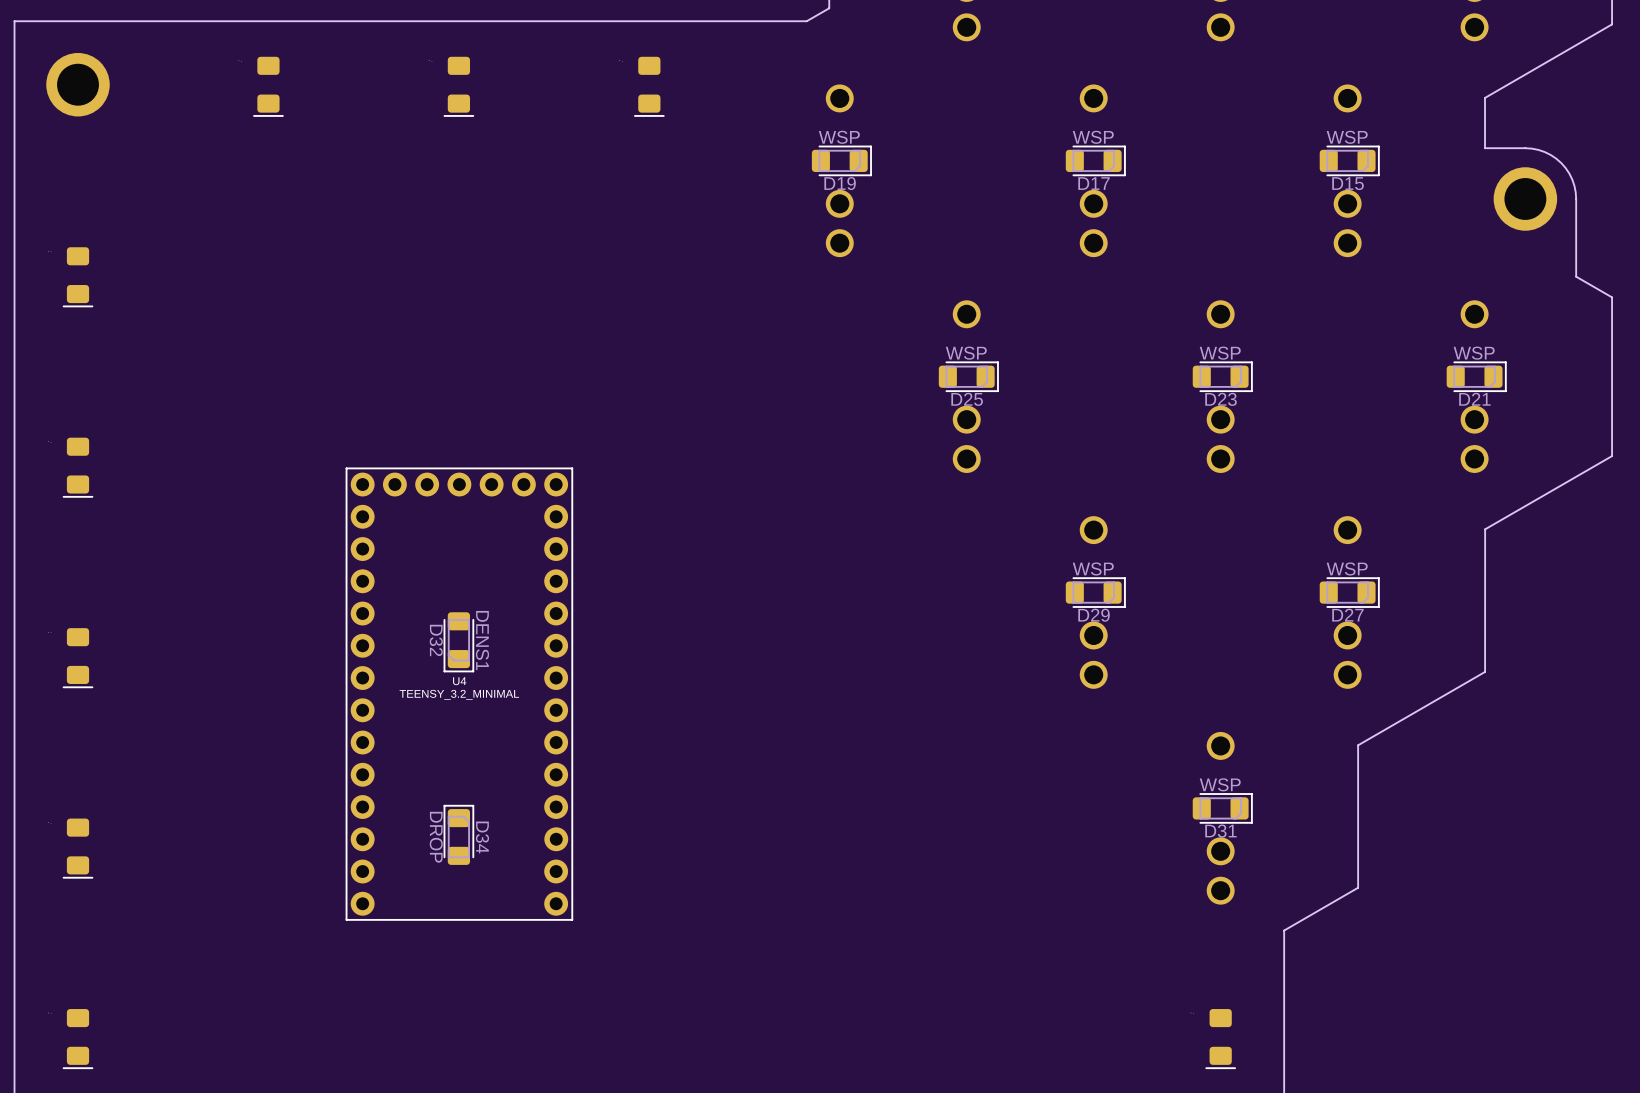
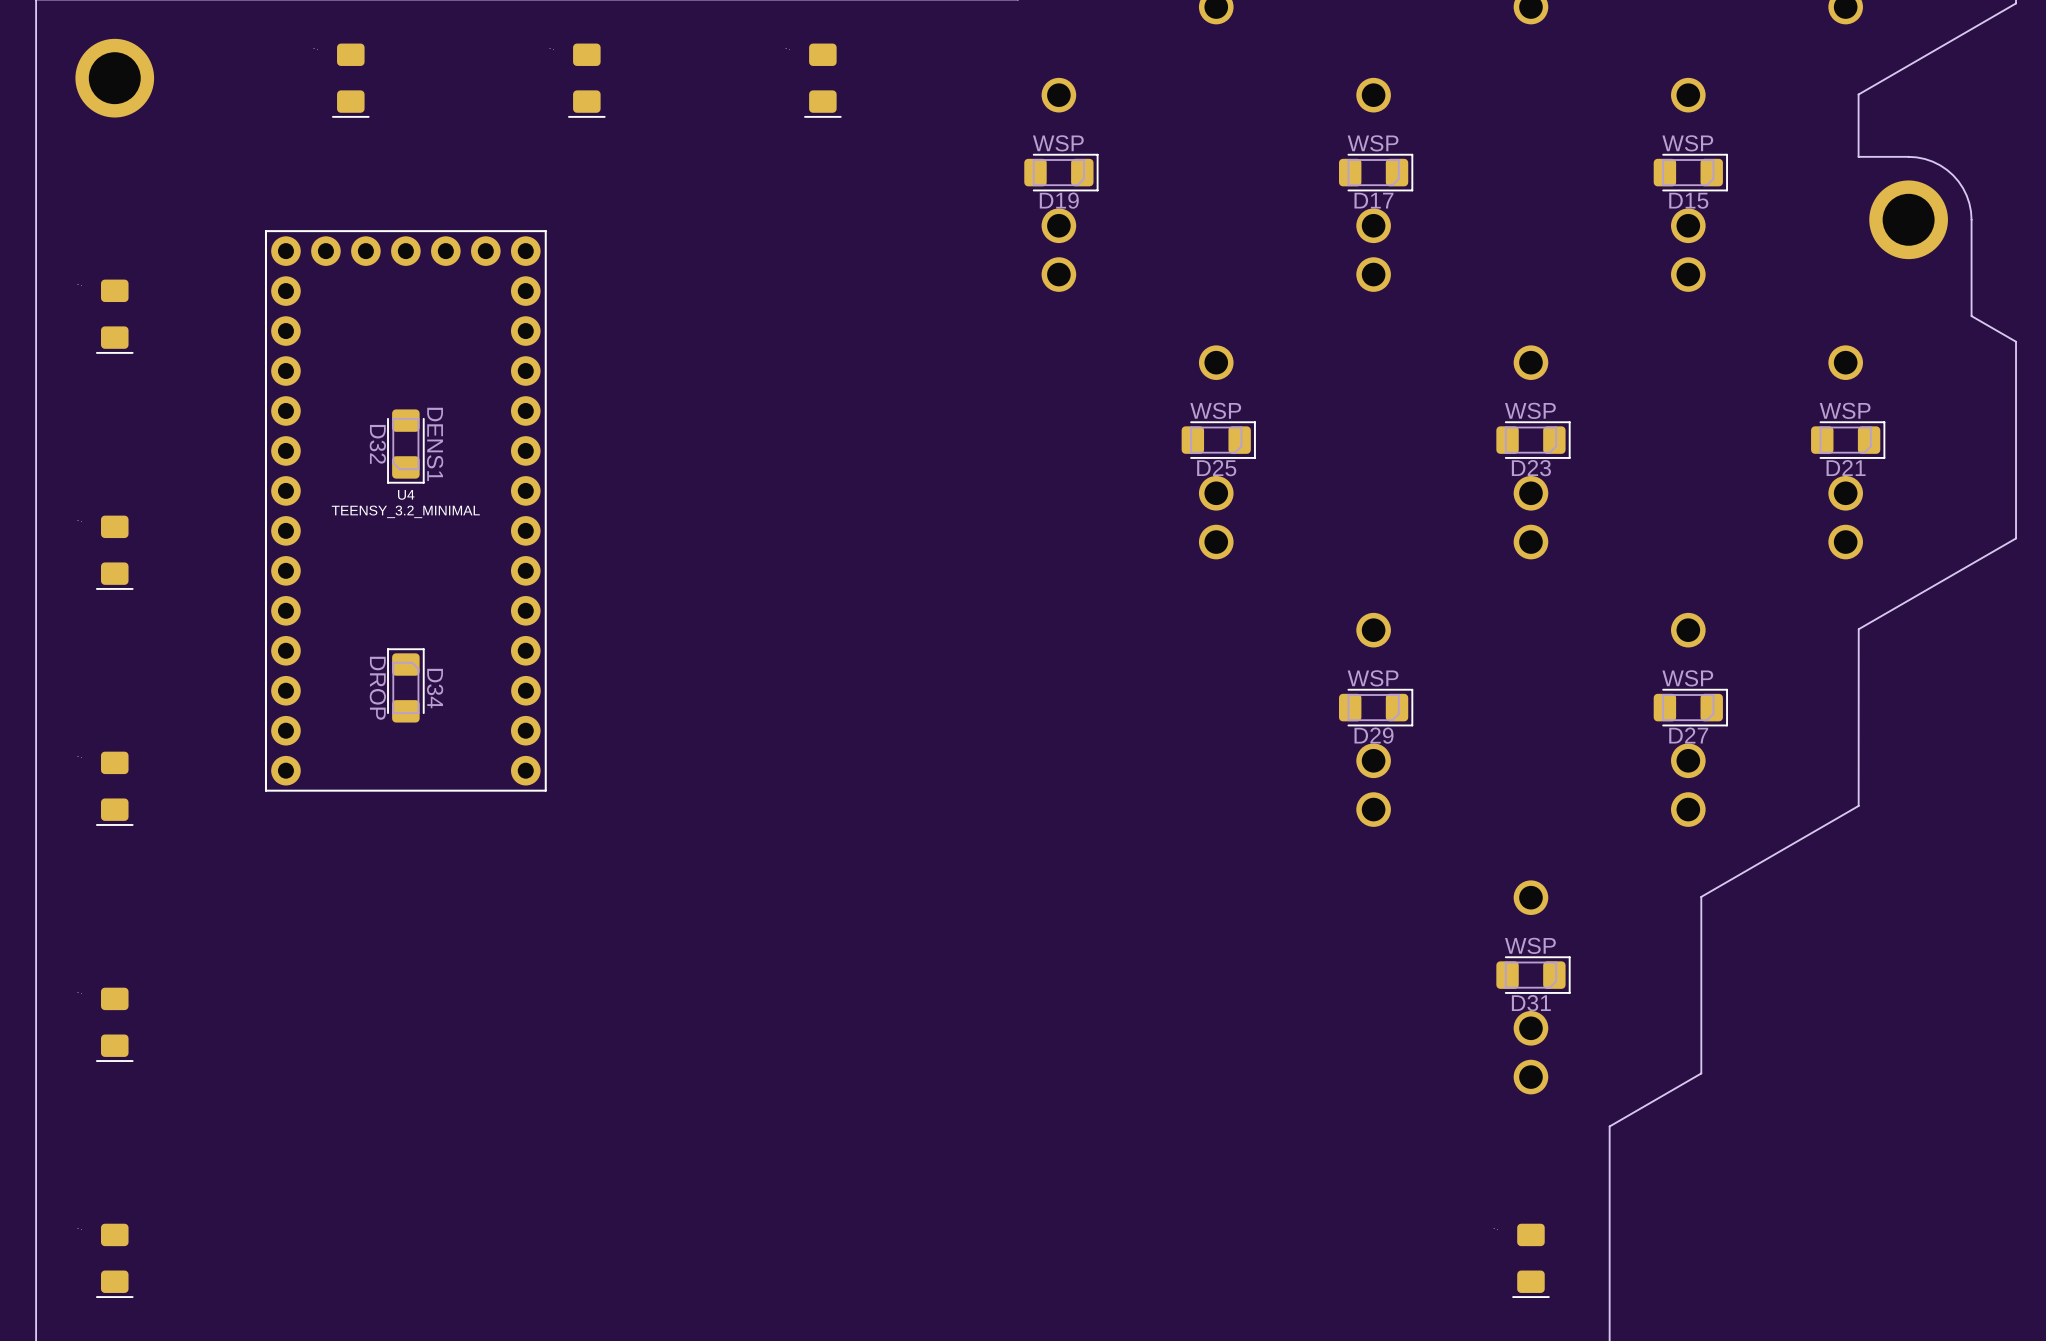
D32 position: (458, 642) -> (405, 446)
U4 position: (459, 694) -> (405, 510)
D34 position: (458, 834) -> (405, 685)

